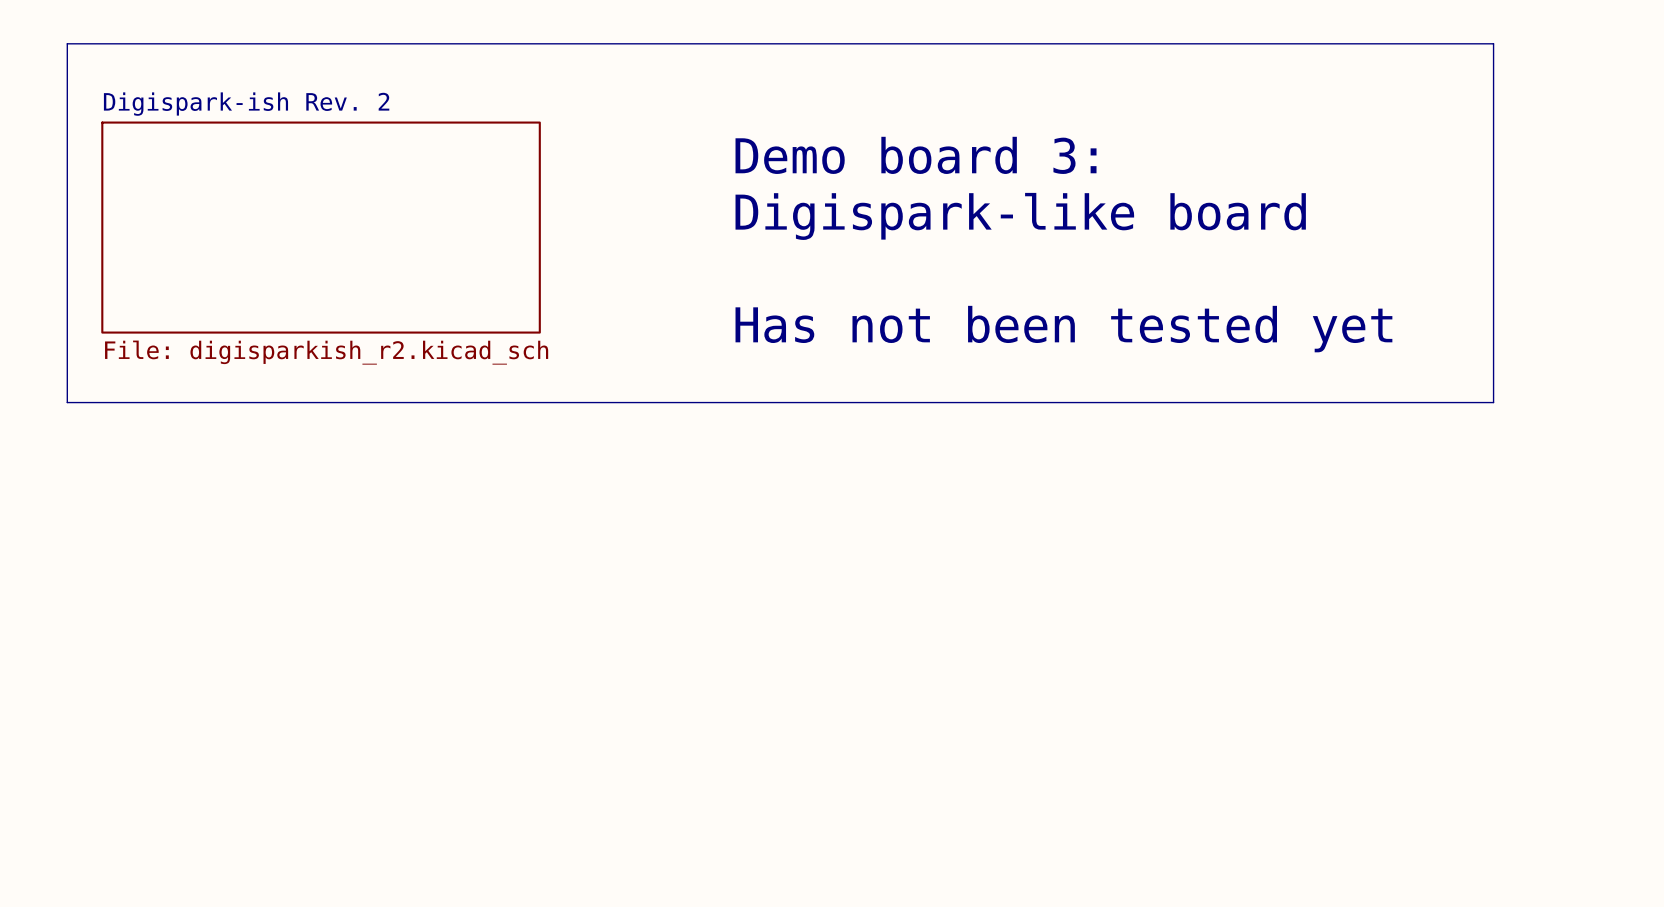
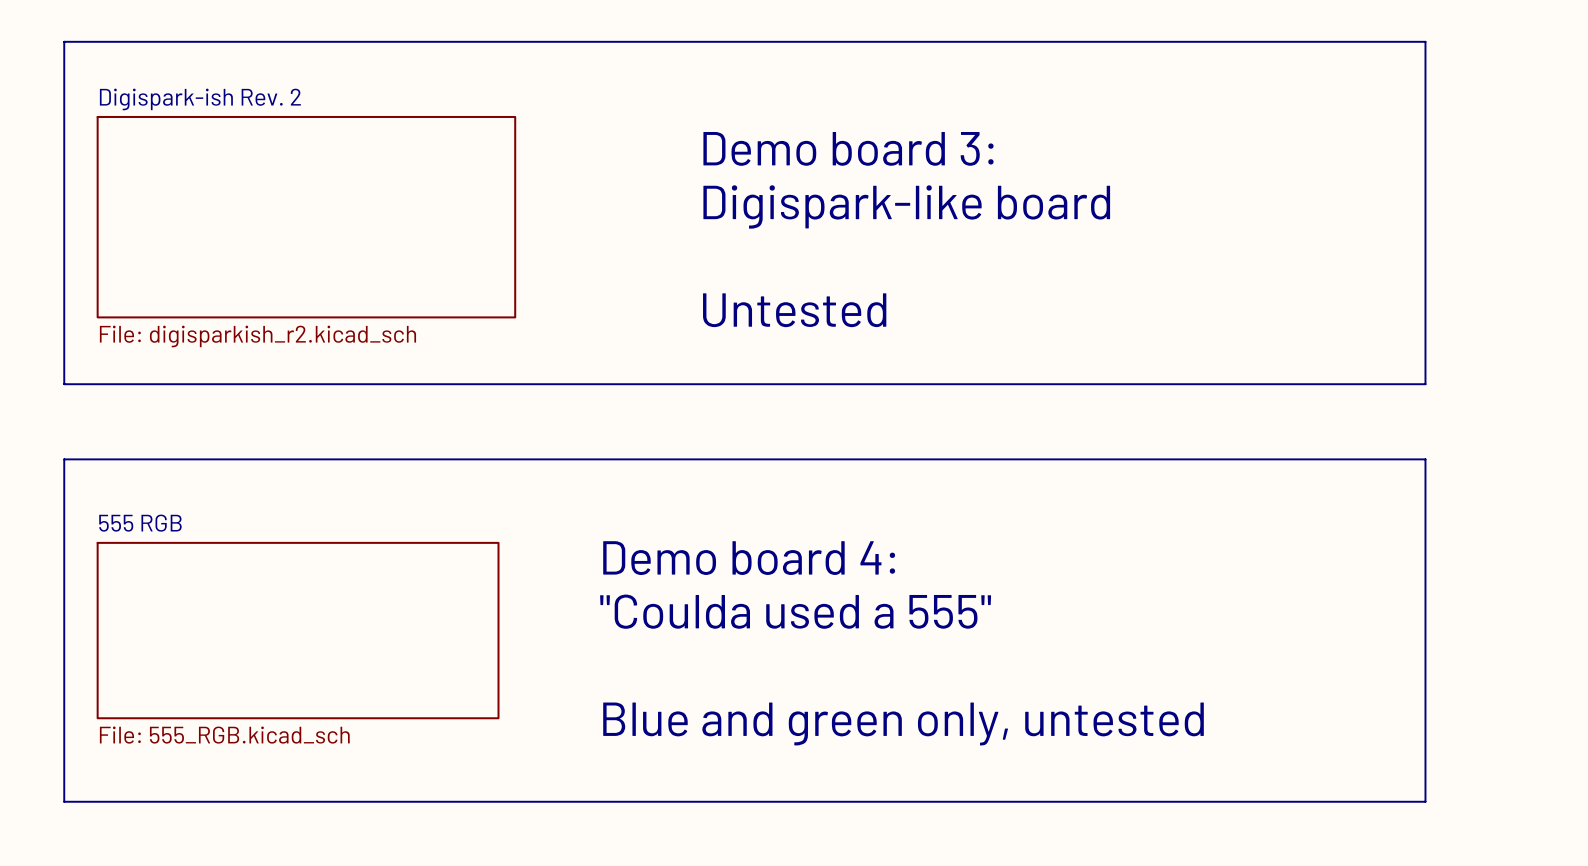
text: Has not been tested yet (1063, 329) -> Untested (794, 310)
line: none -> (64, 459) (64, 801) (1425, 801) (1425, 459) (64, 459)
text: none -> Demo board 4: (749, 558)
text: none -> "Coulda used a 555" (795, 611)
sheet 555 RGB: none -> File: 555_RGB.kicad_sch (298, 630)
text: none -> Blue and green only, untested (903, 724)

